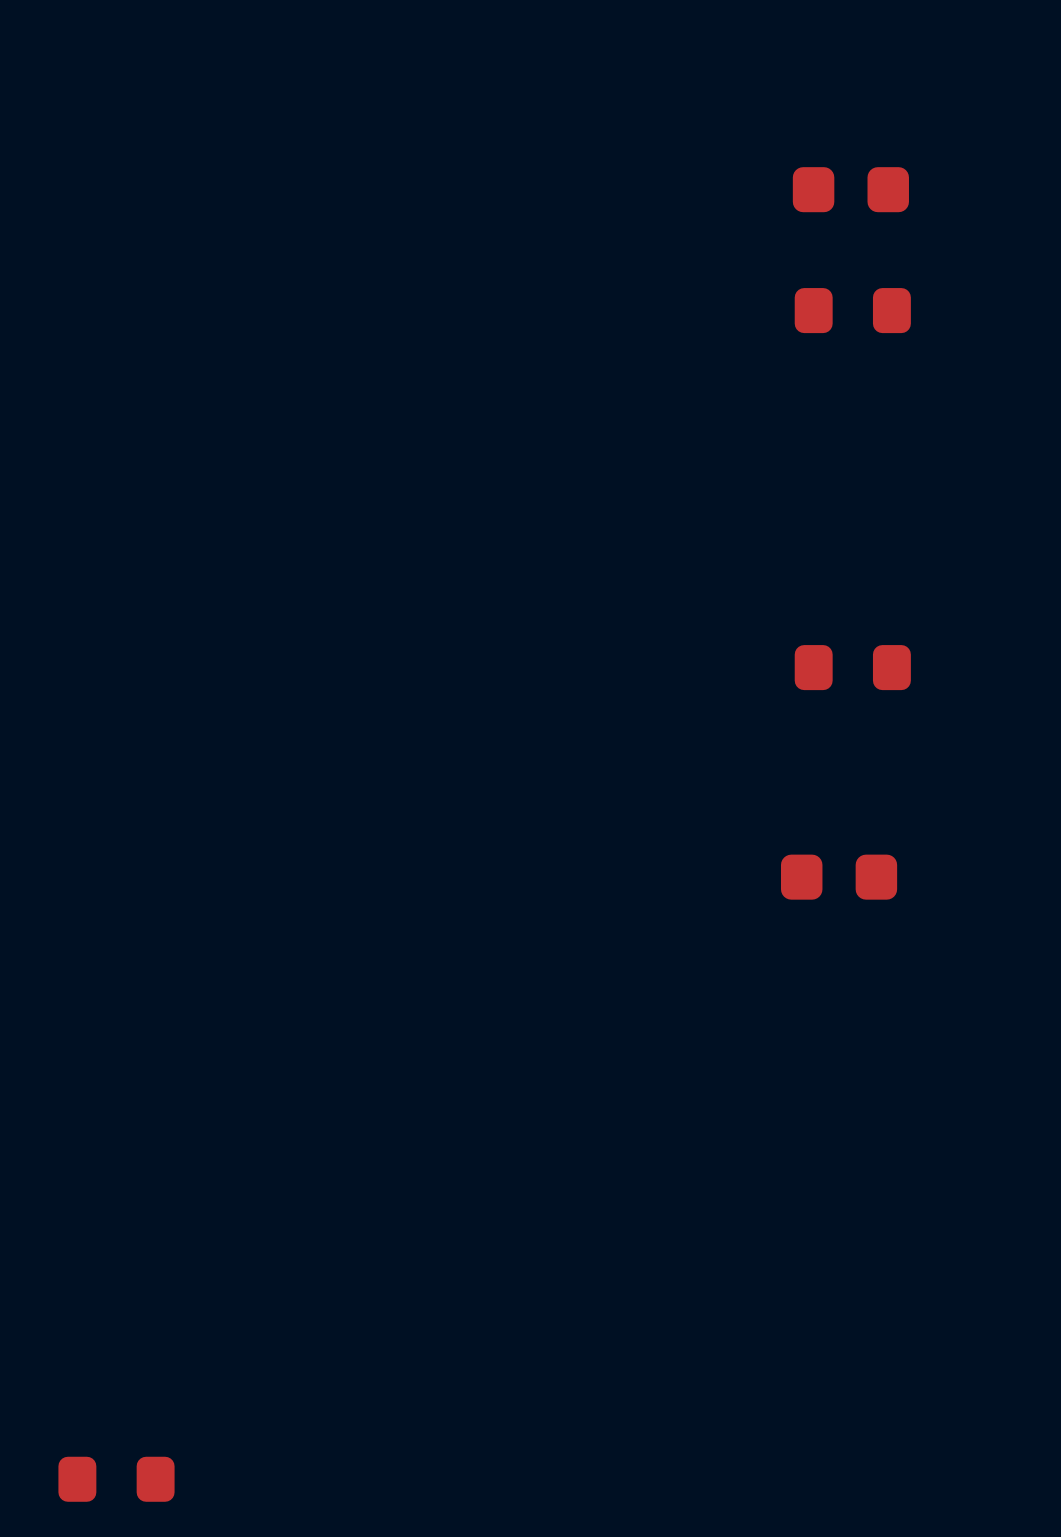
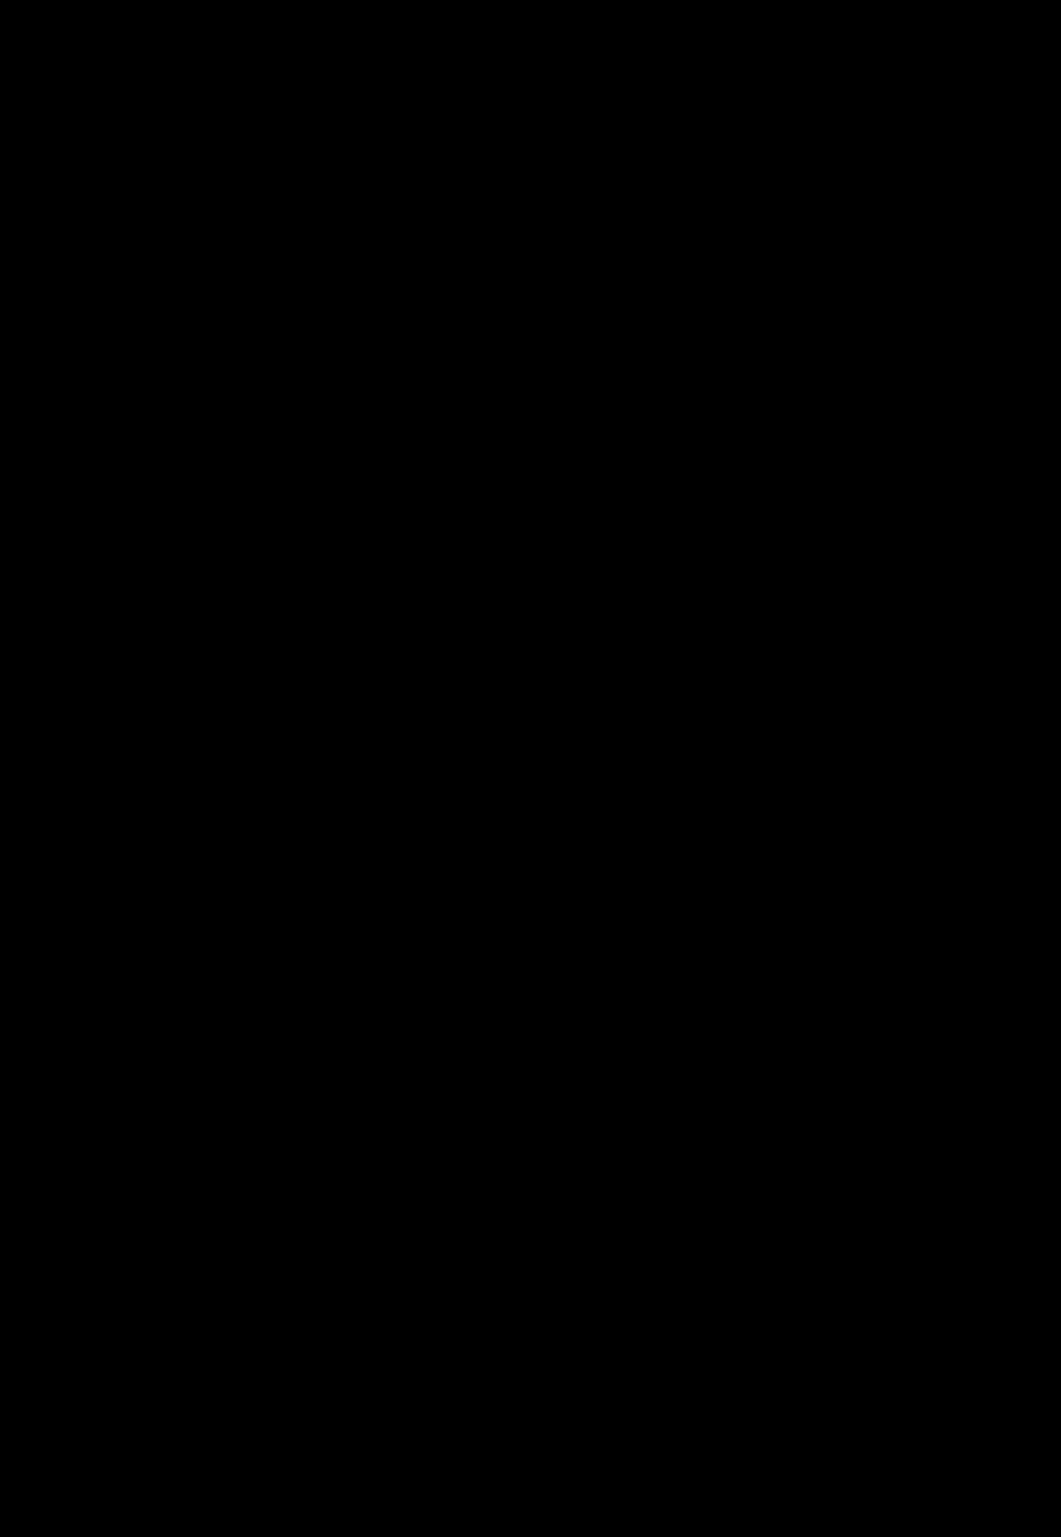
part: (850, 189) -> none
part: (852, 310) -> none
part: (852, 667) -> none
part: (839, 877) -> none
part: (116, 1479) -> none

